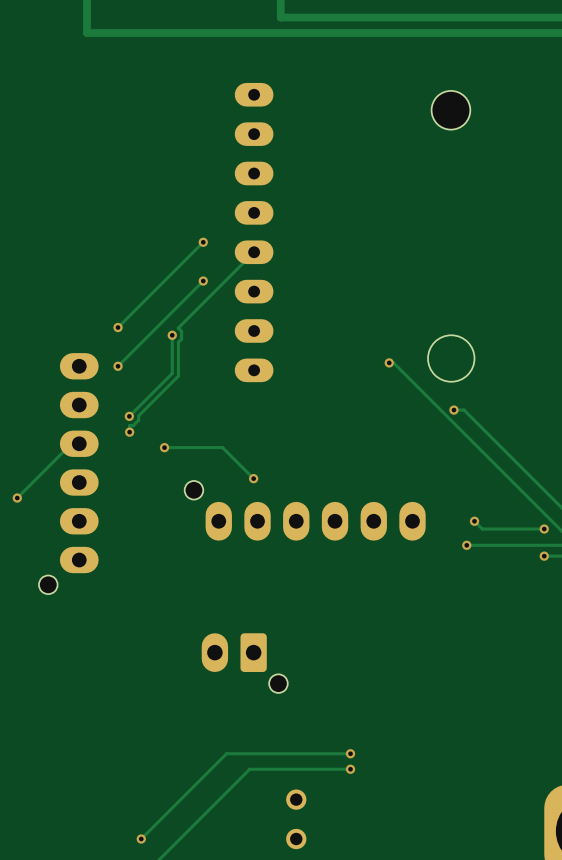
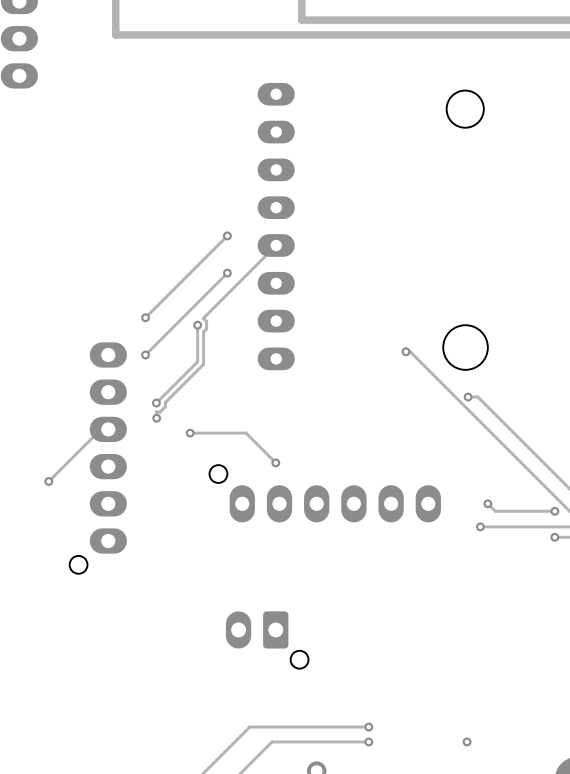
via: none -> (467, 741)

